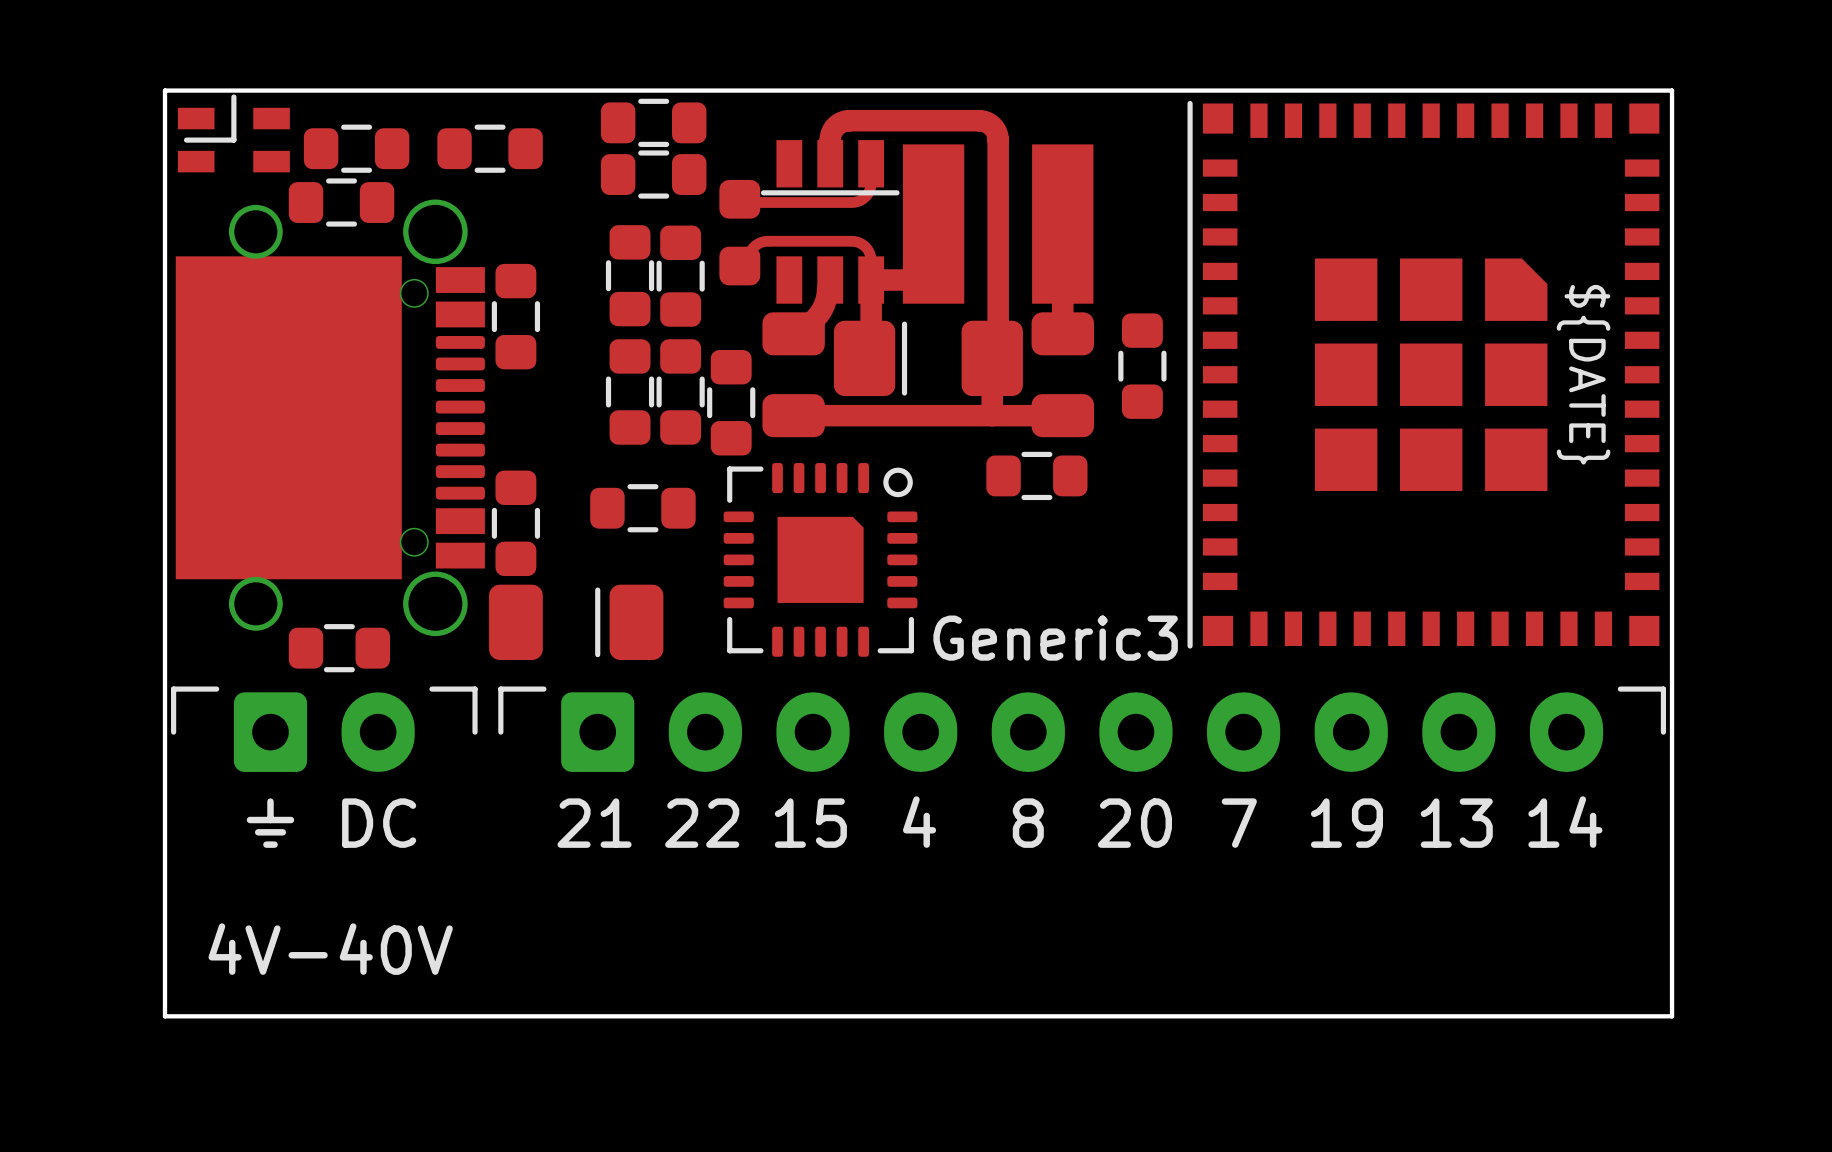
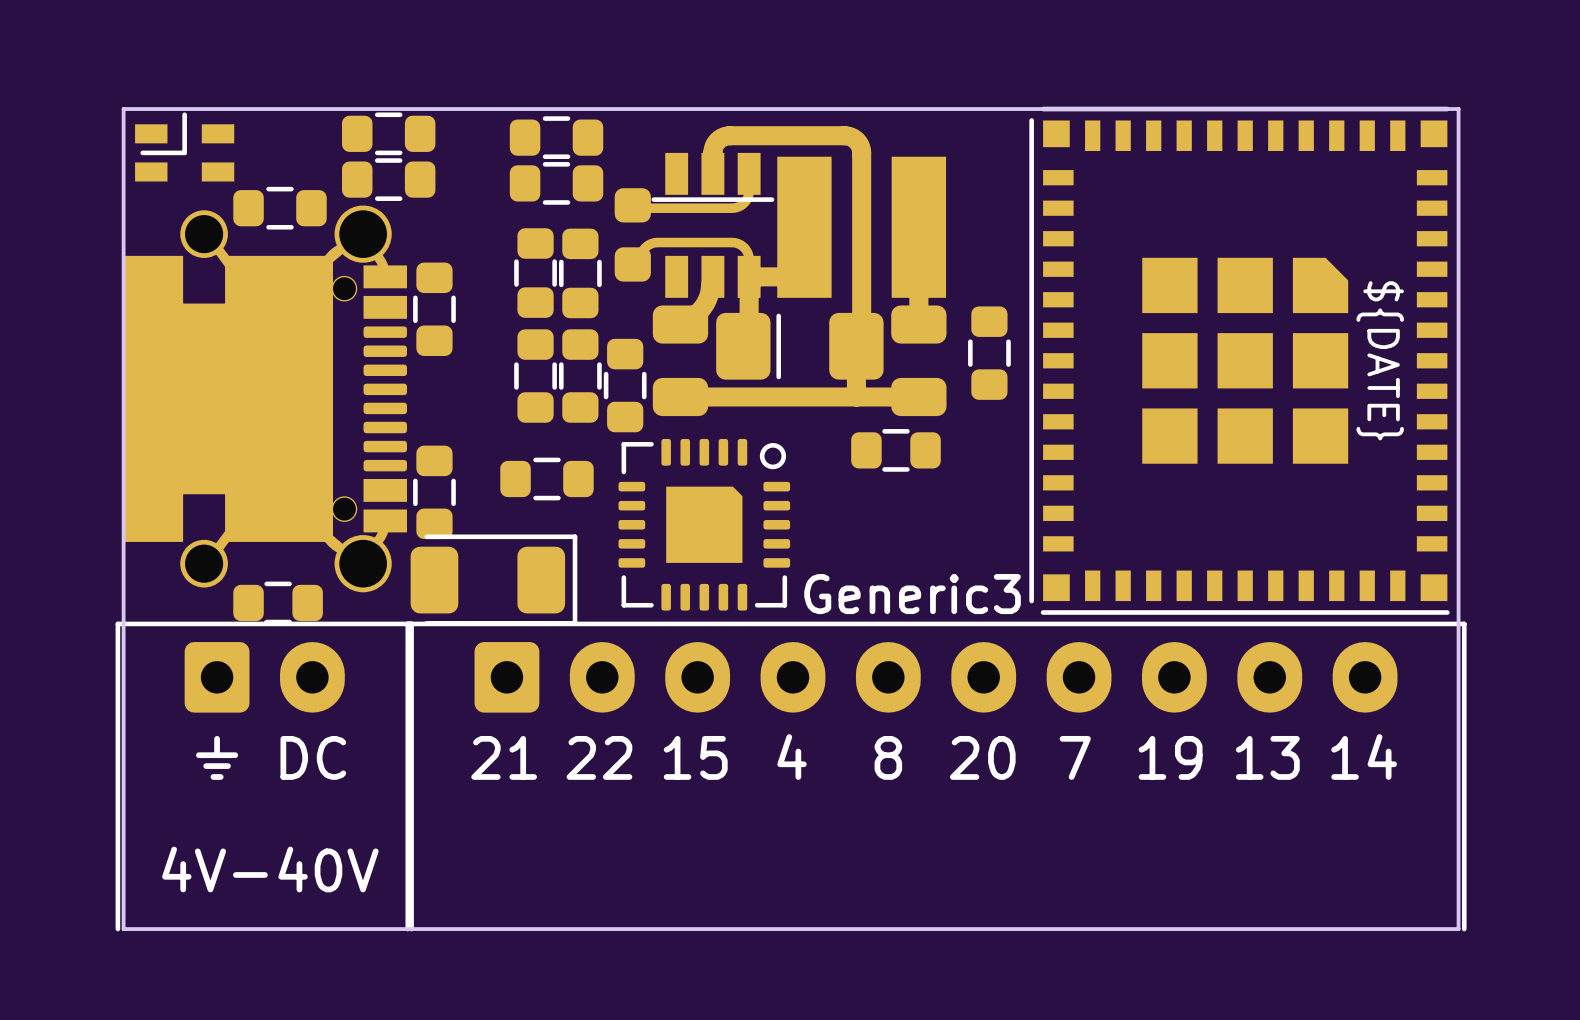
part footprint: [1187, 100, 1660, 649] -> [1029, 106, 1450, 615]
part: none -> (388, 133)
part: (356, 148) -> none
part: (490, 148) -> none
part: none -> (388, 179)
part footprint: [175, 199, 485, 637] -> [123, 205, 408, 593]
part footprint: [489, 584, 664, 661] -> [410, 534, 578, 626]
part: (324, 729) -> none
part: (1082, 729) -> none
part: none -> (264, 776)
part: none -> (936, 776)

